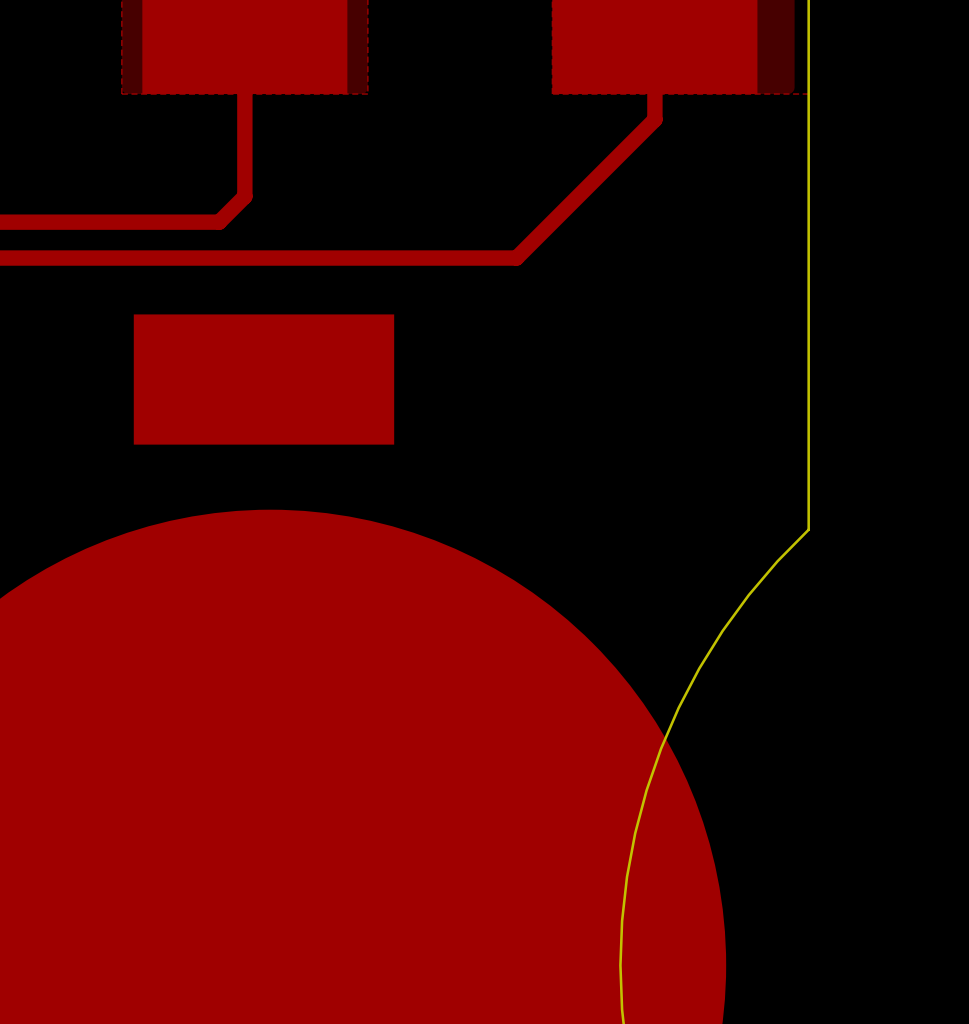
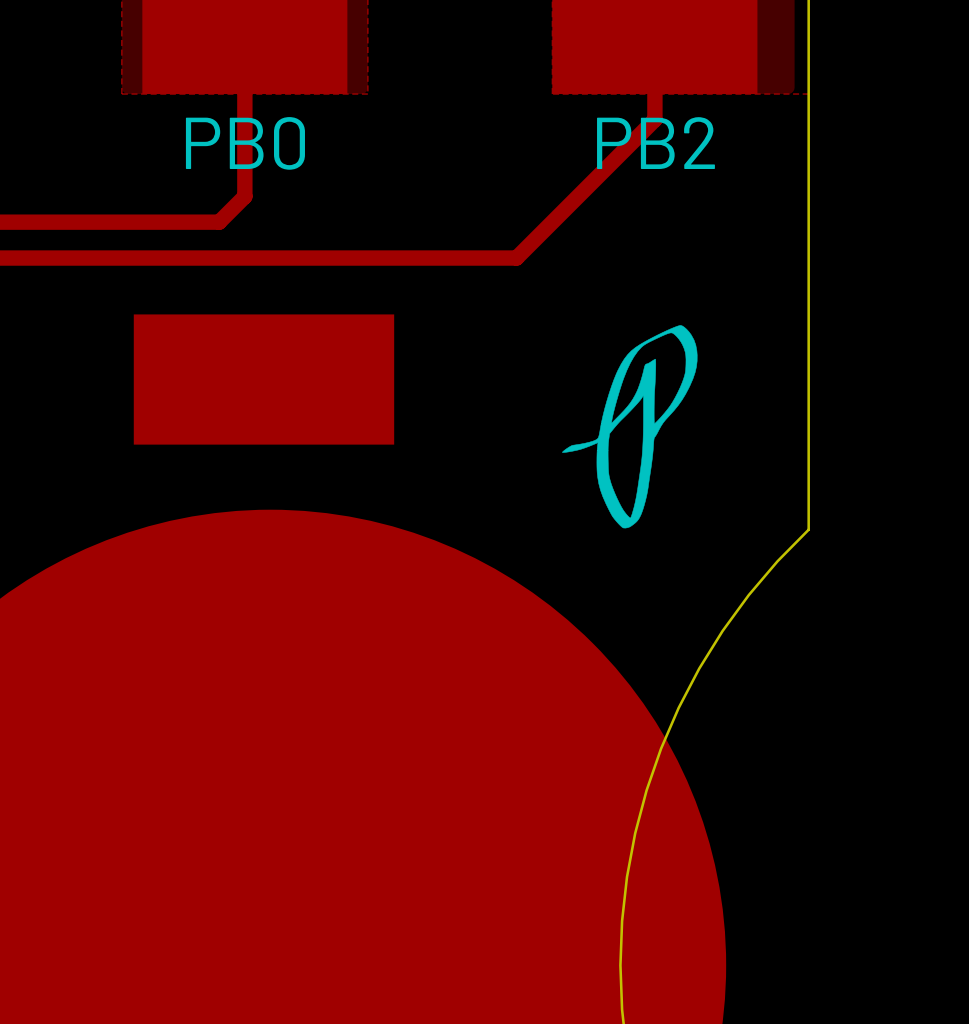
text: none -> PB0 (245, 143)
text: none -> PB2 (655, 143)
drawing: none -> [562, 325, 698, 529]

